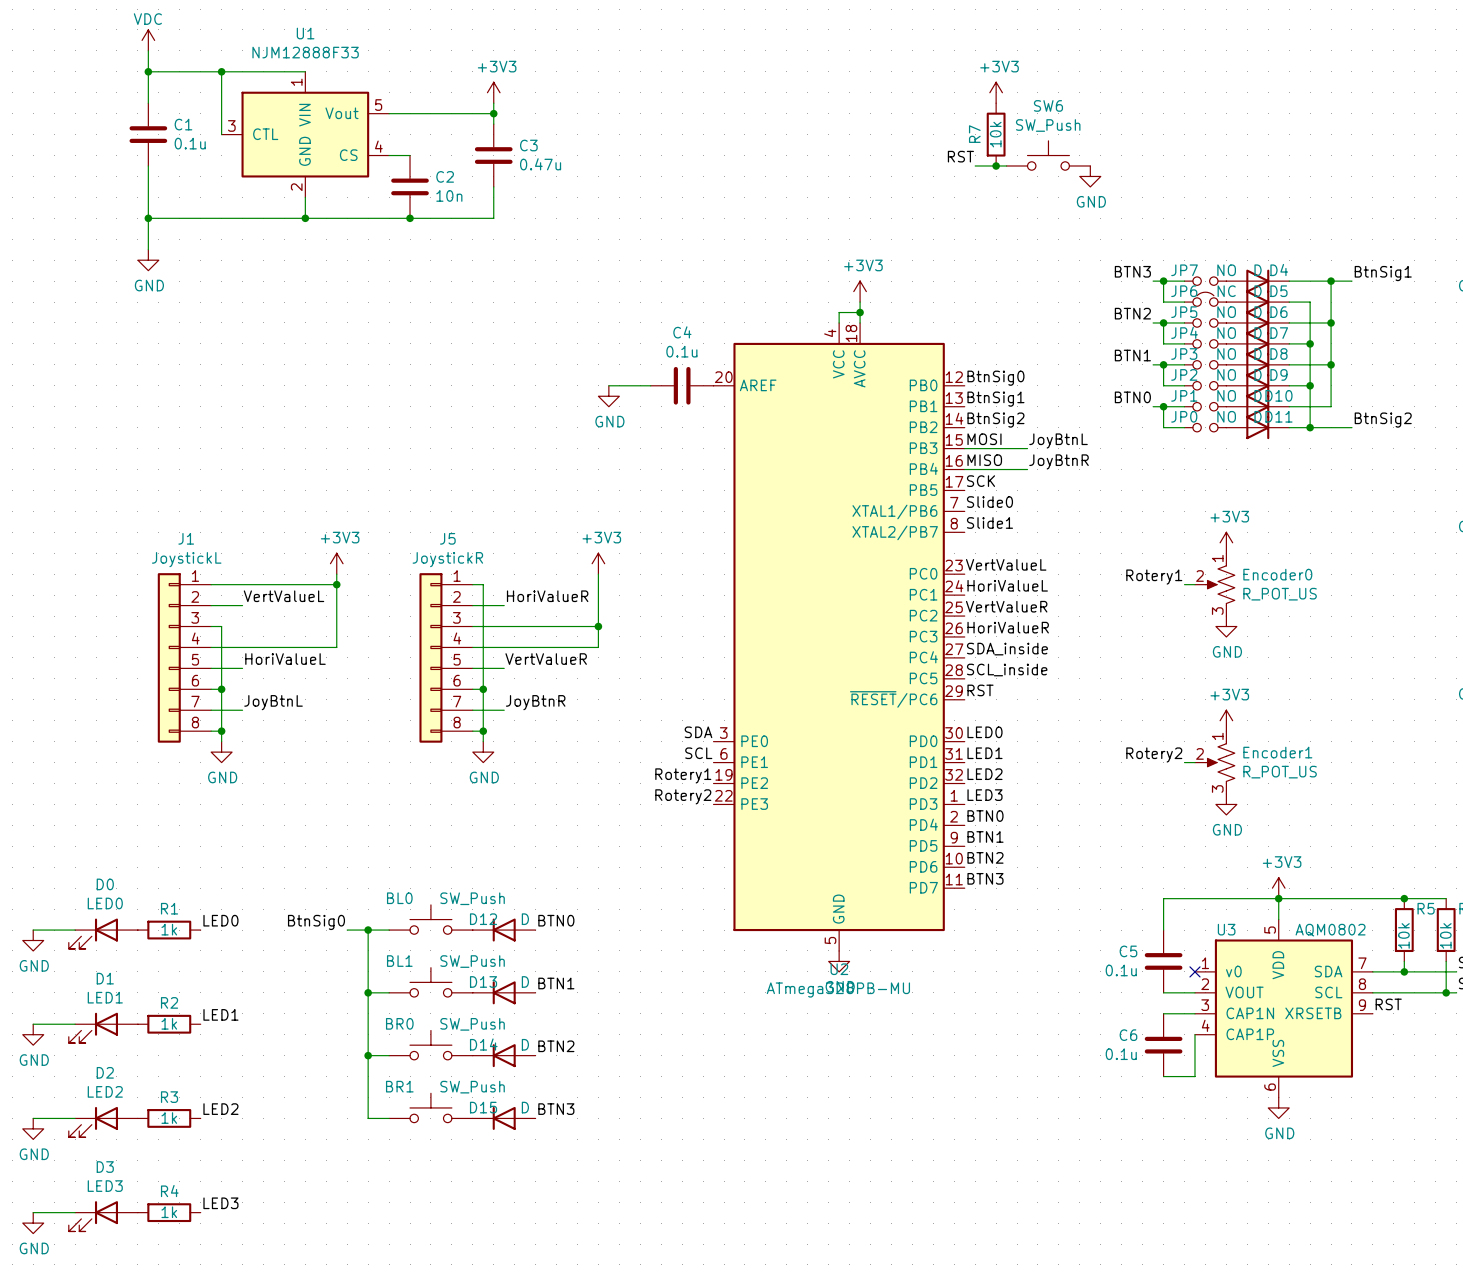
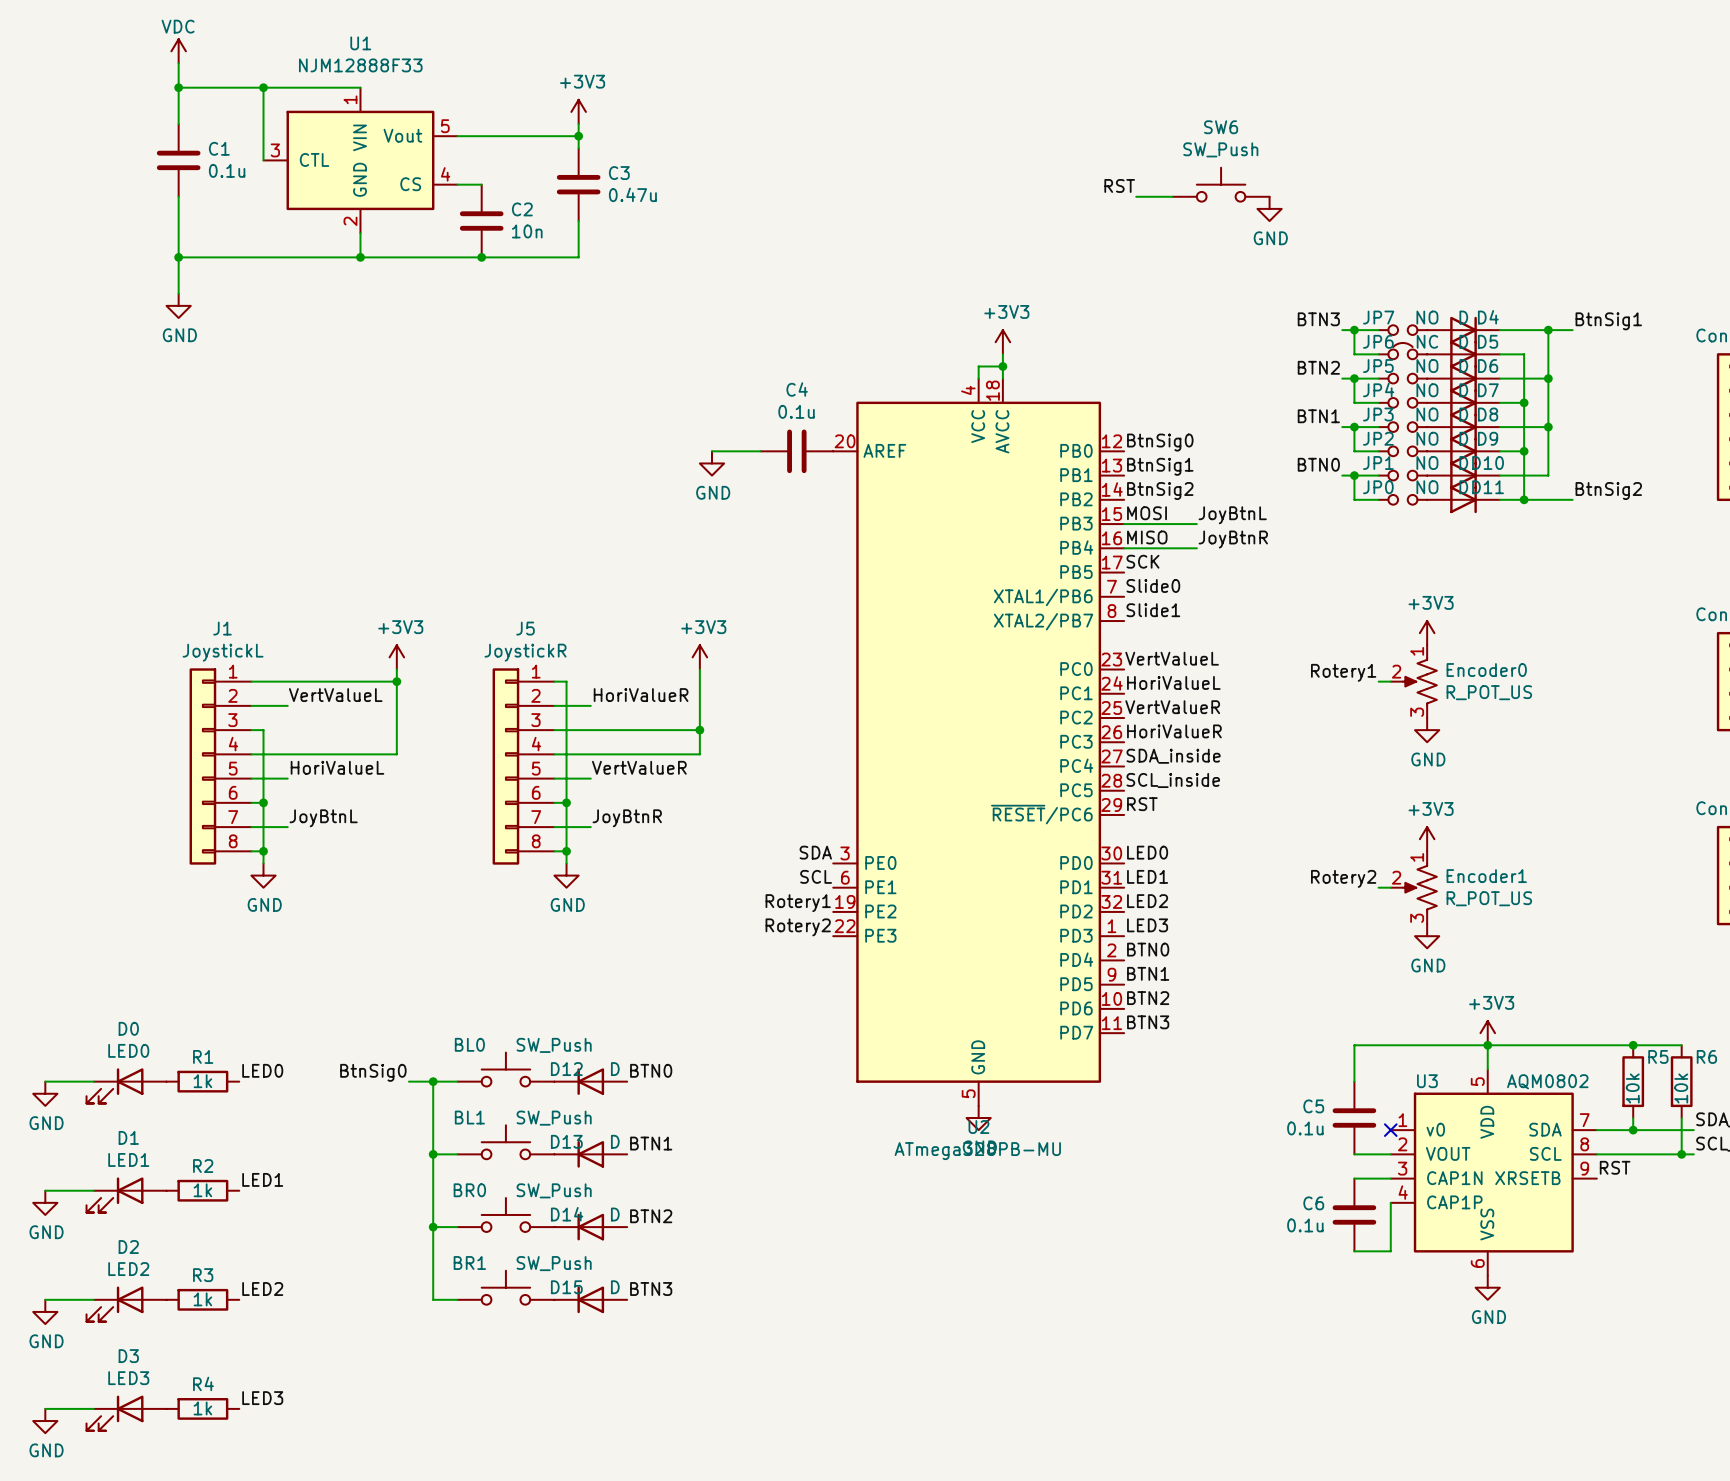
power symbol: +3V3 (996, 92) -> none
R7: 10k (996, 134) -> none
junction: (996, 165) -> none

